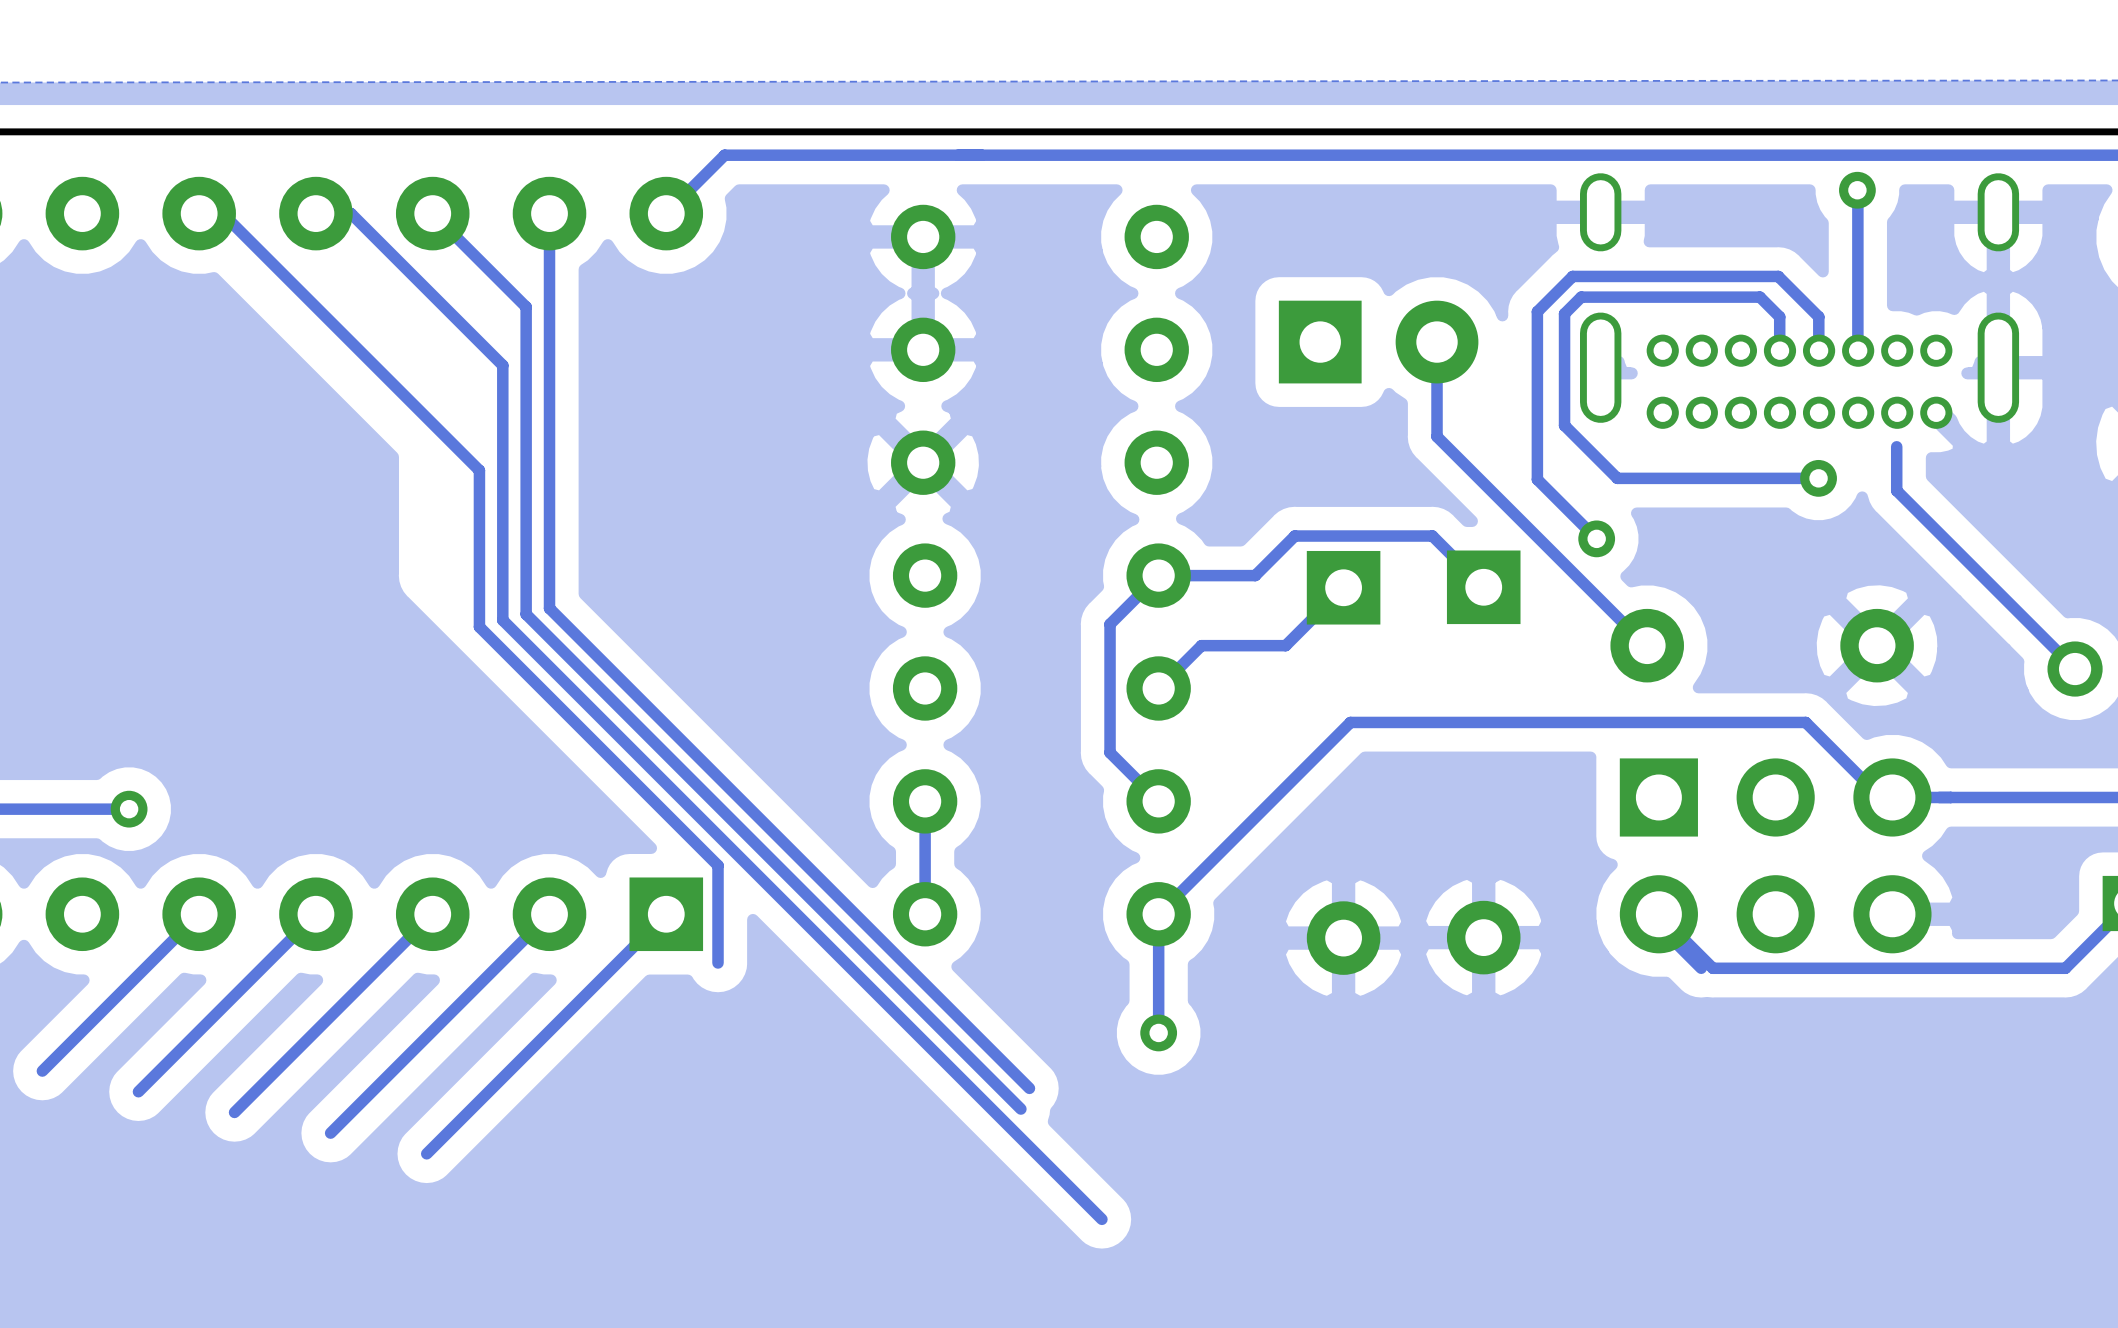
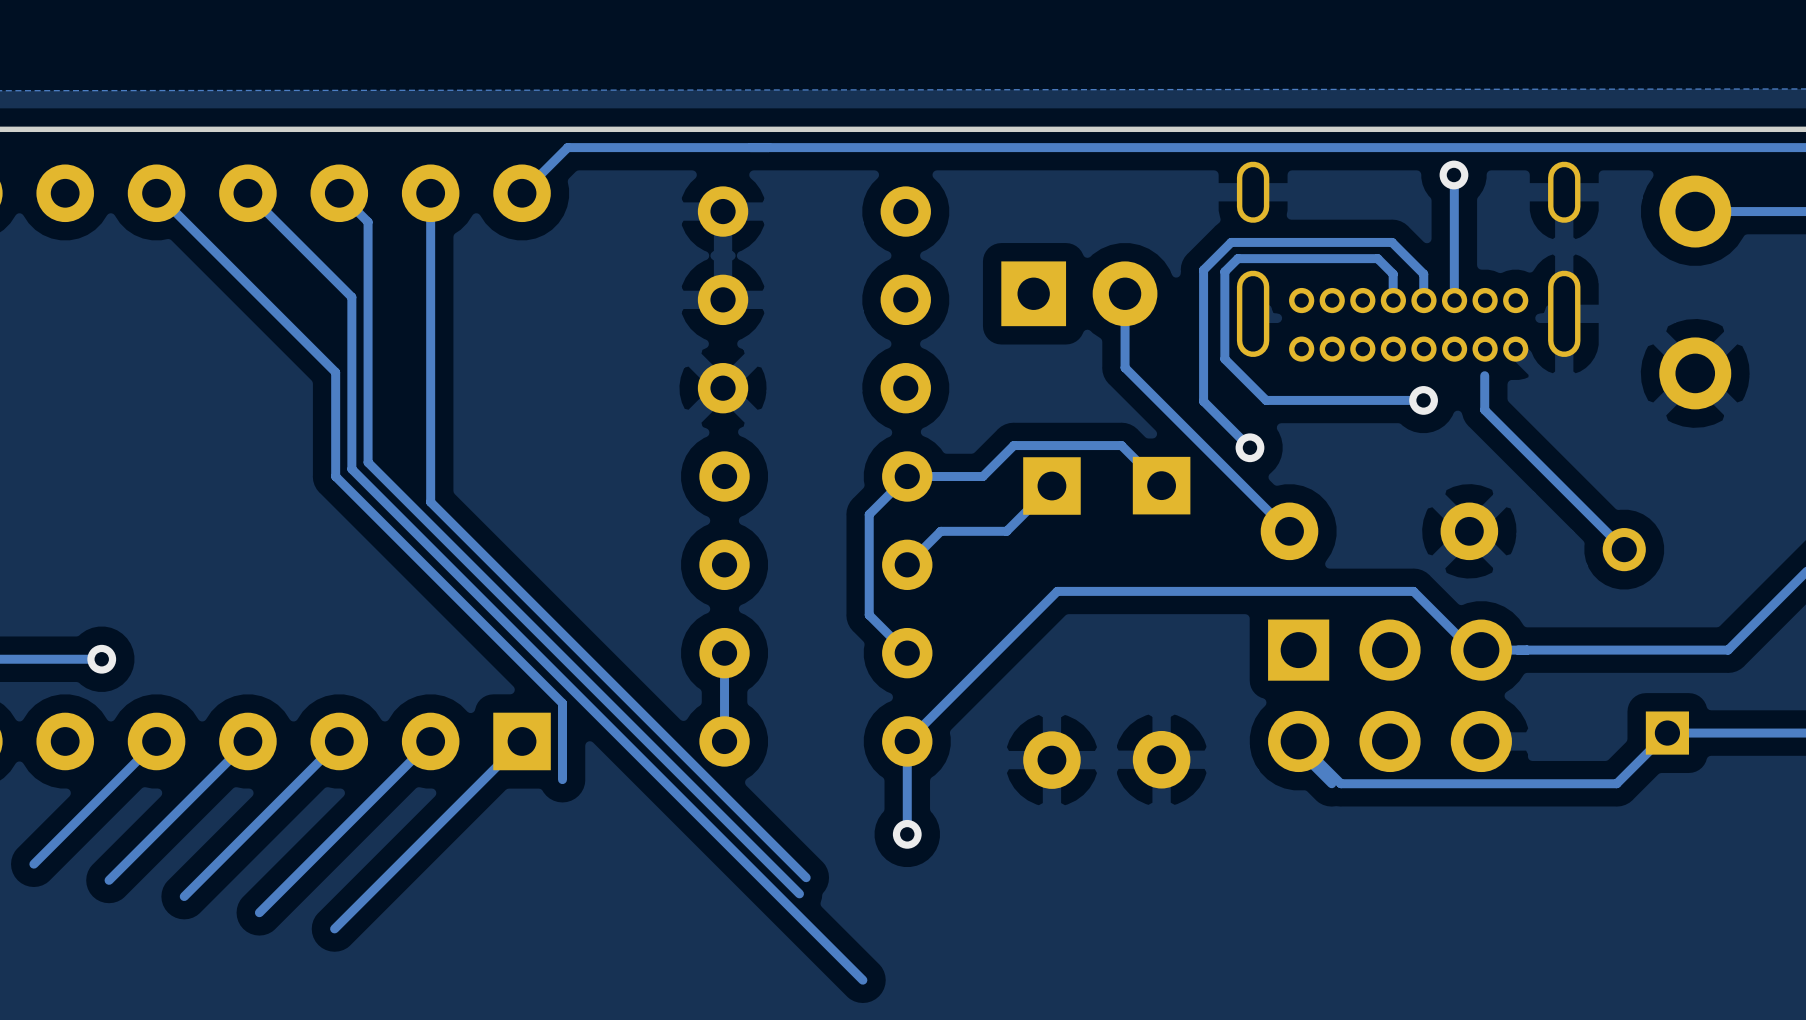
track: (199, 213) (222, 213) (479, 470) (479, 626) -> (156, 193) (335, 372) (335, 476) (375, 516)
track: (315, 213) (350, 213) (502, 365) (502, 620) -> (247, 193) (351, 297) (351, 469) (394, 511)
track: (469, 250) (526, 307) (526, 614) -> (368, 222) (368, 462) (412, 506)

